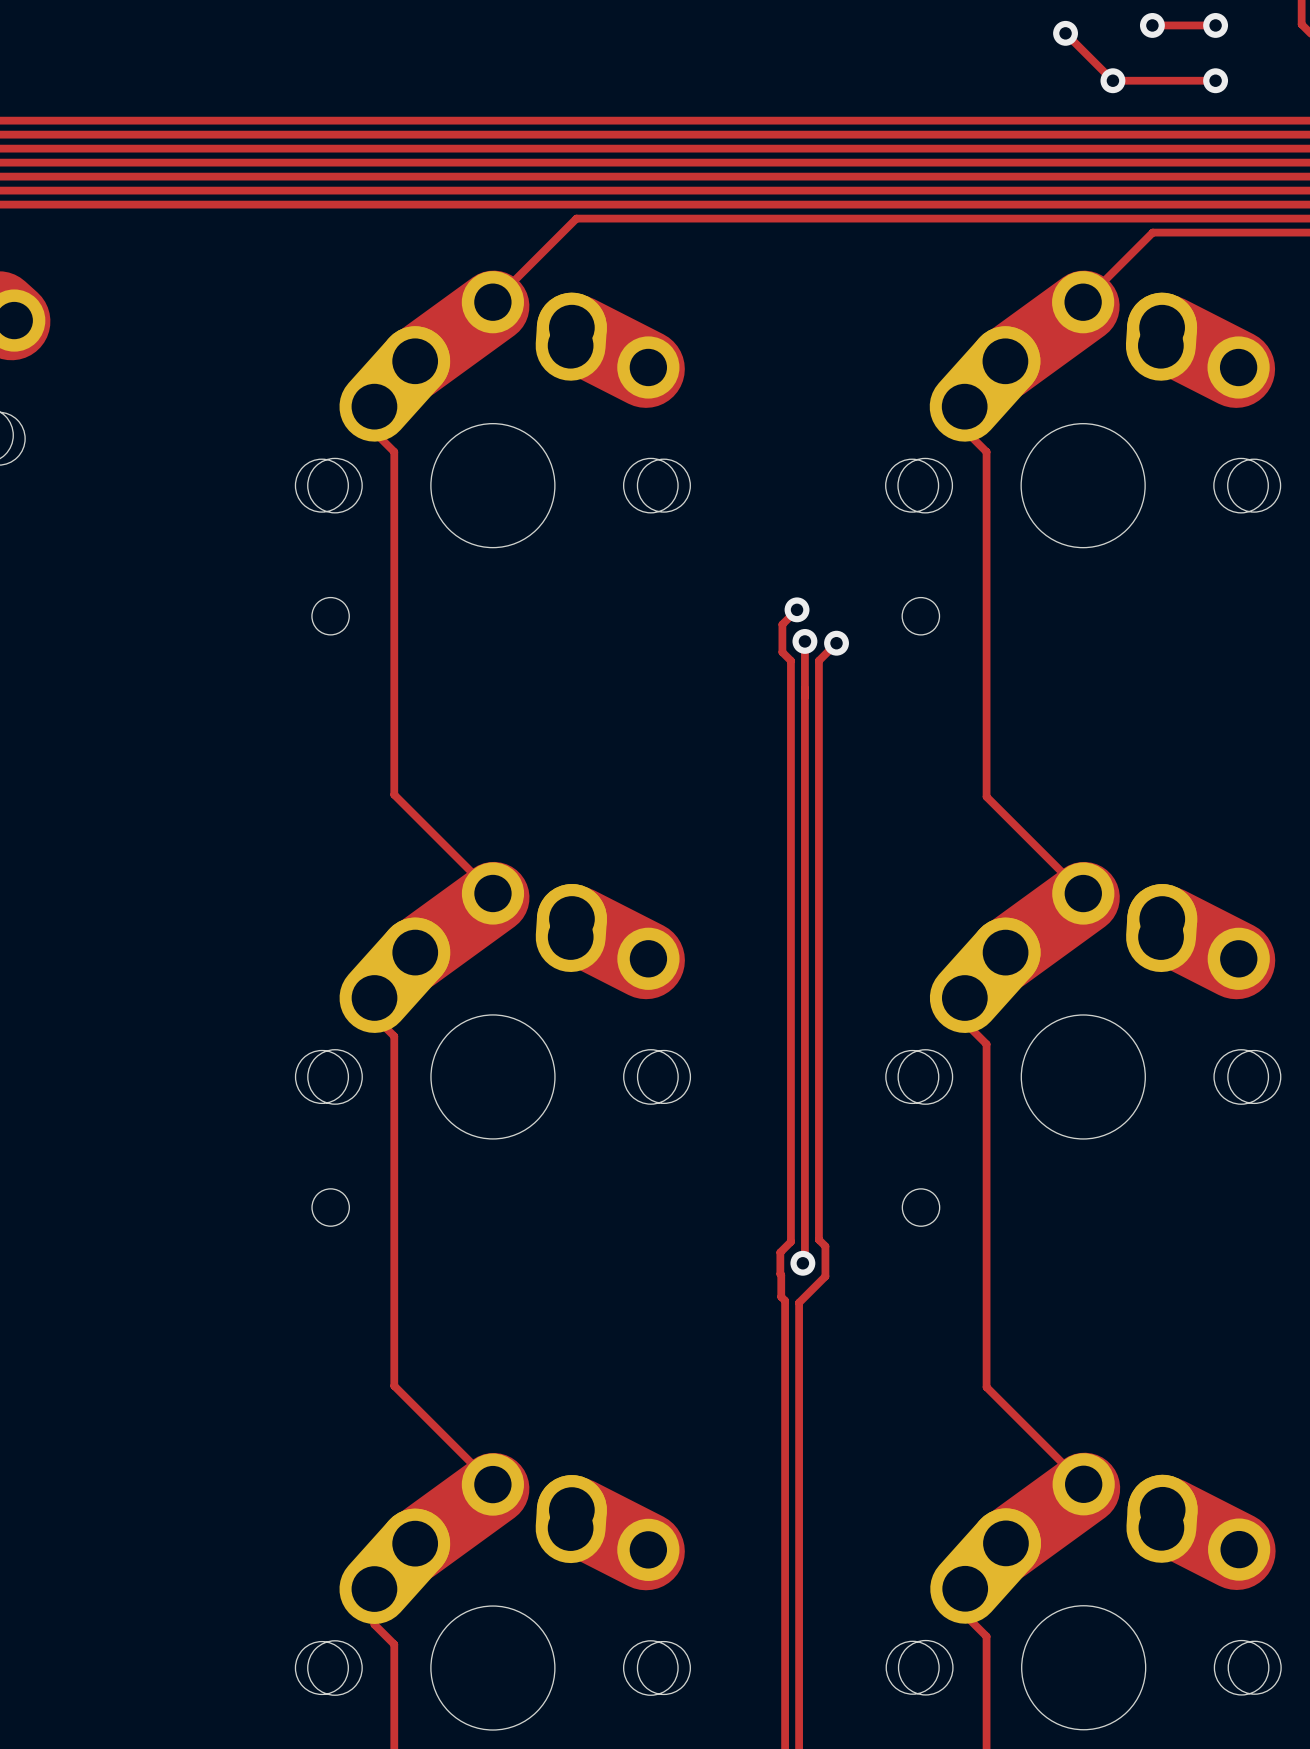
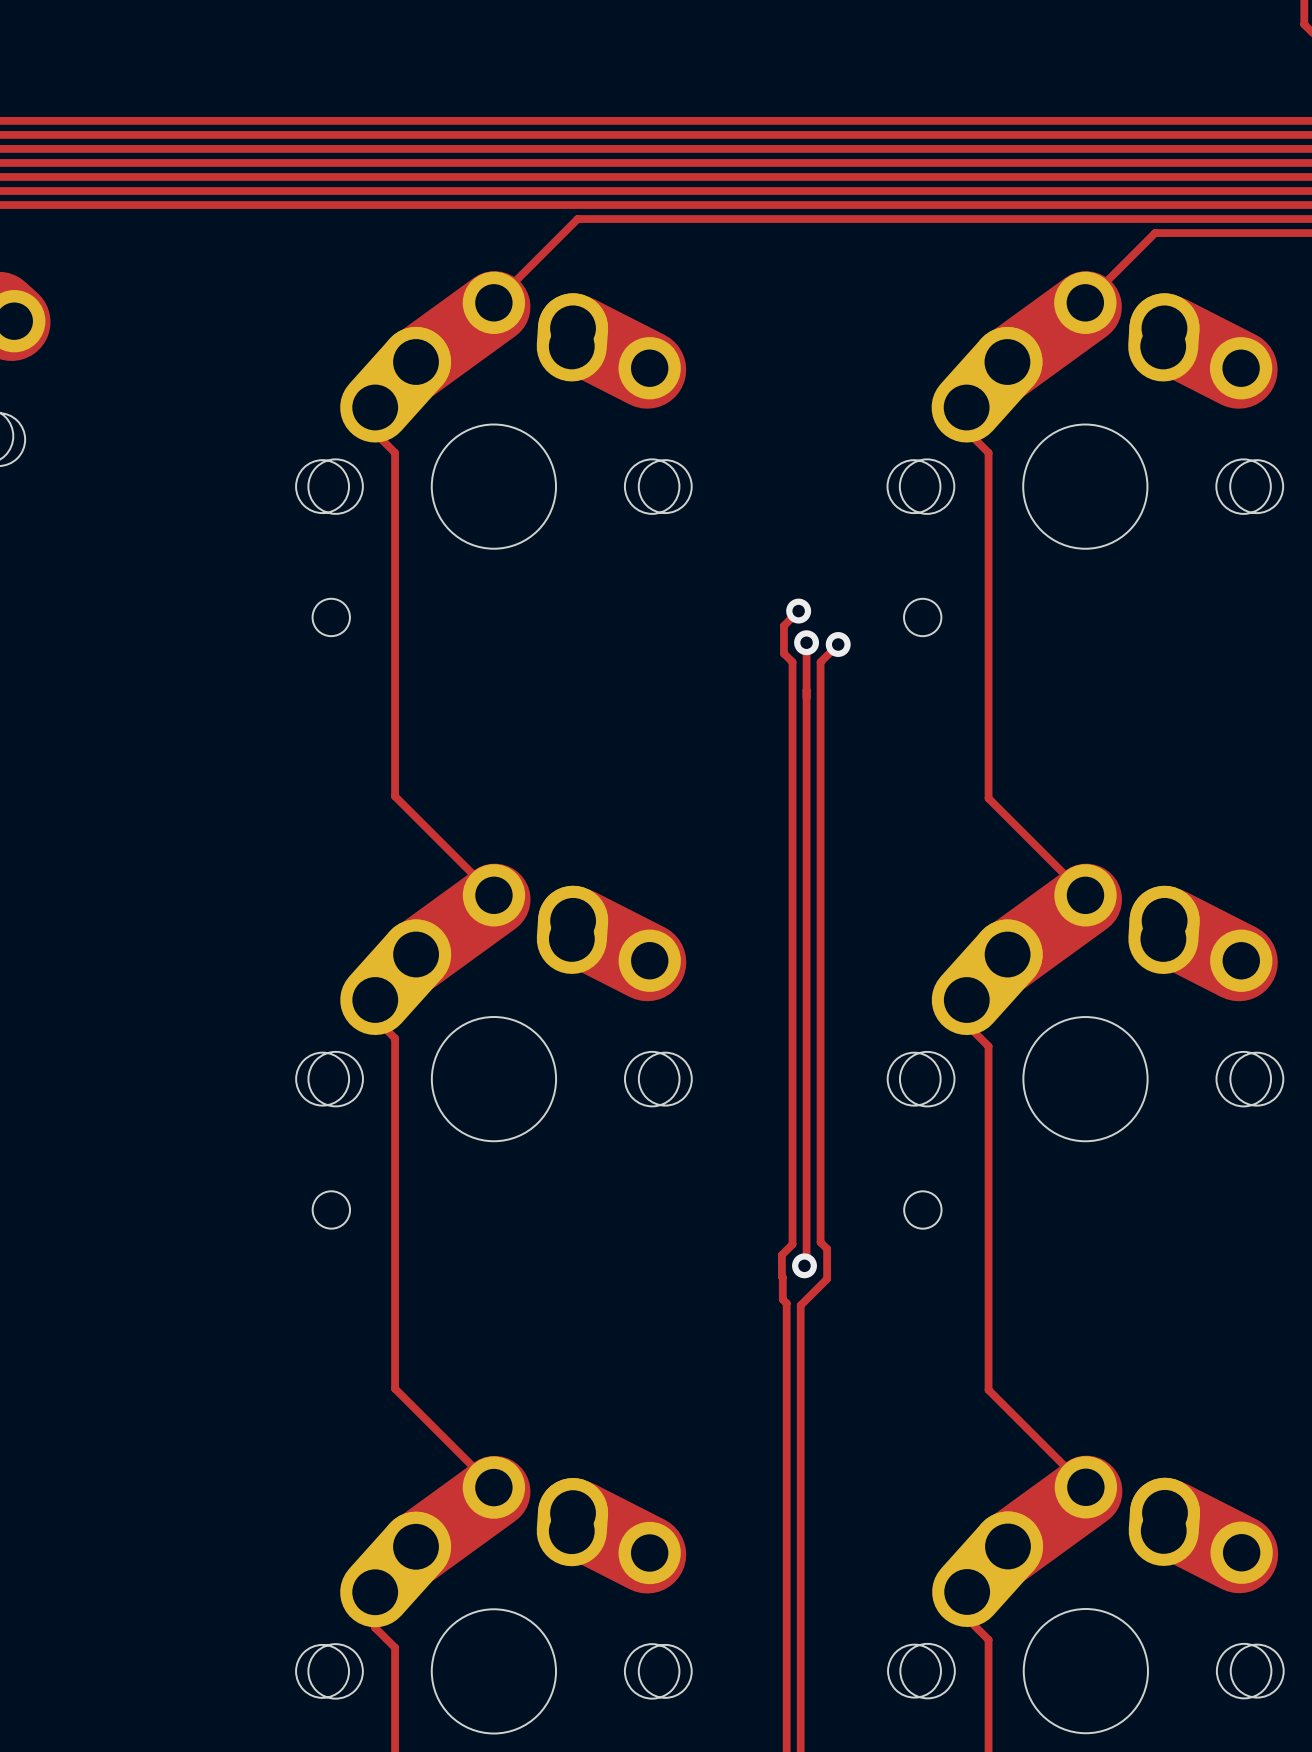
track: (1152, 25) (1215, 25) -> none
via: (1152, 25) -> none
via: (1215, 25) -> none
track: (1065, 33) (1112, 80) (1215, 80) -> none
via: (1065, 33) -> none
via: (1112, 80) -> none
via: (1215, 80) -> none

